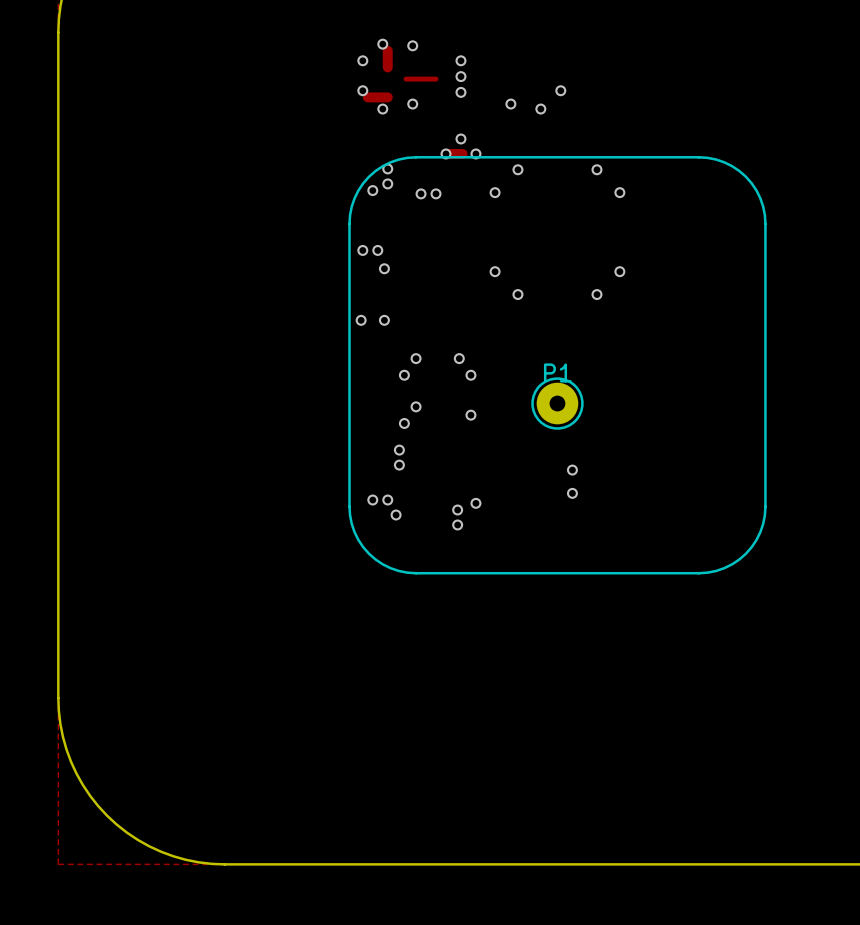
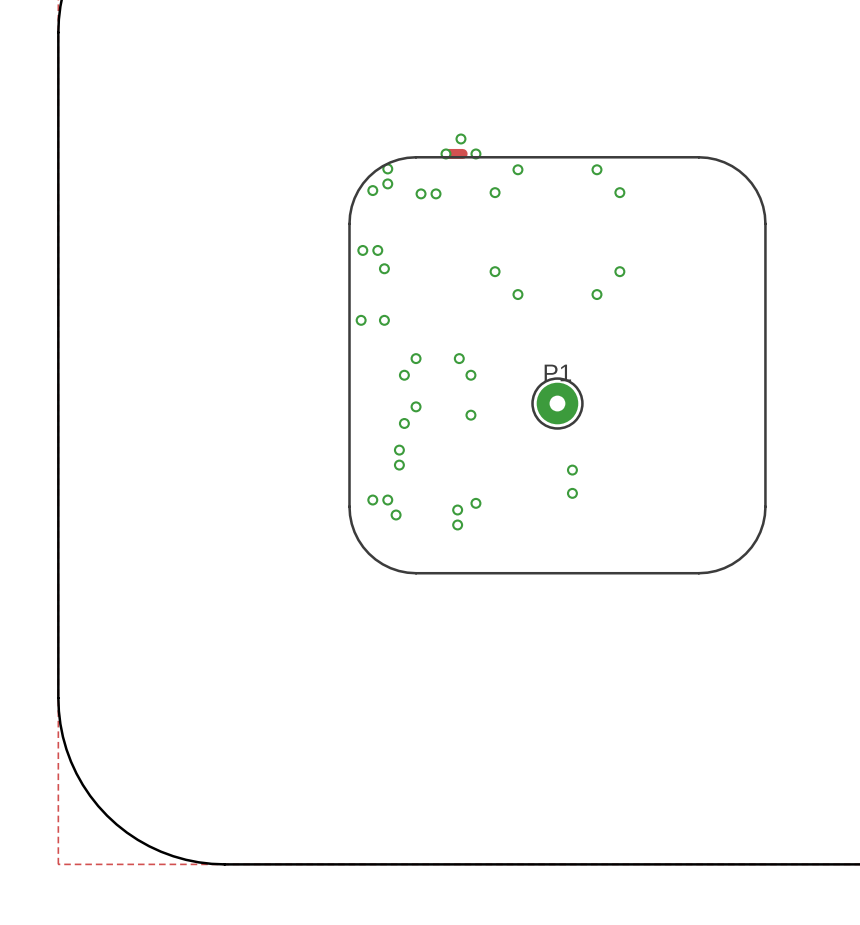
via: (382, 44) -> none
via: (412, 45) -> none
track: (387, 50) (387, 67) -> none
via: (362, 60) -> none
via: (460, 60) -> none
via: (460, 76) -> none
track: (406, 79) (436, 79) -> none
via: (362, 90) -> none
via: (560, 90) -> none
via: (460, 92) -> none
track: (367, 97) (387, 97) -> none
via: (412, 104) -> none
via: (510, 104) -> none
via: (382, 109) -> none
via: (540, 109) -> none

